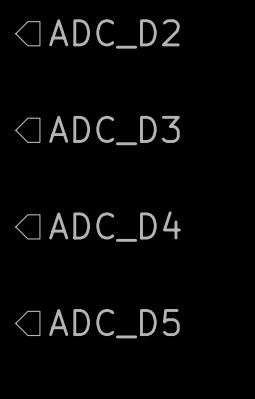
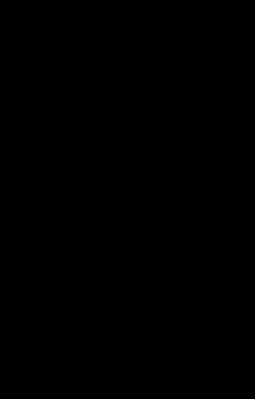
hierarchical label: ADC_D2 (114, 33) -> none
hierarchical label: ADC_D3 (114, 130) -> none
hierarchical label: ADC_D4 (115, 226) -> none
hierarchical label: ADC_D5 (114, 323) -> none

